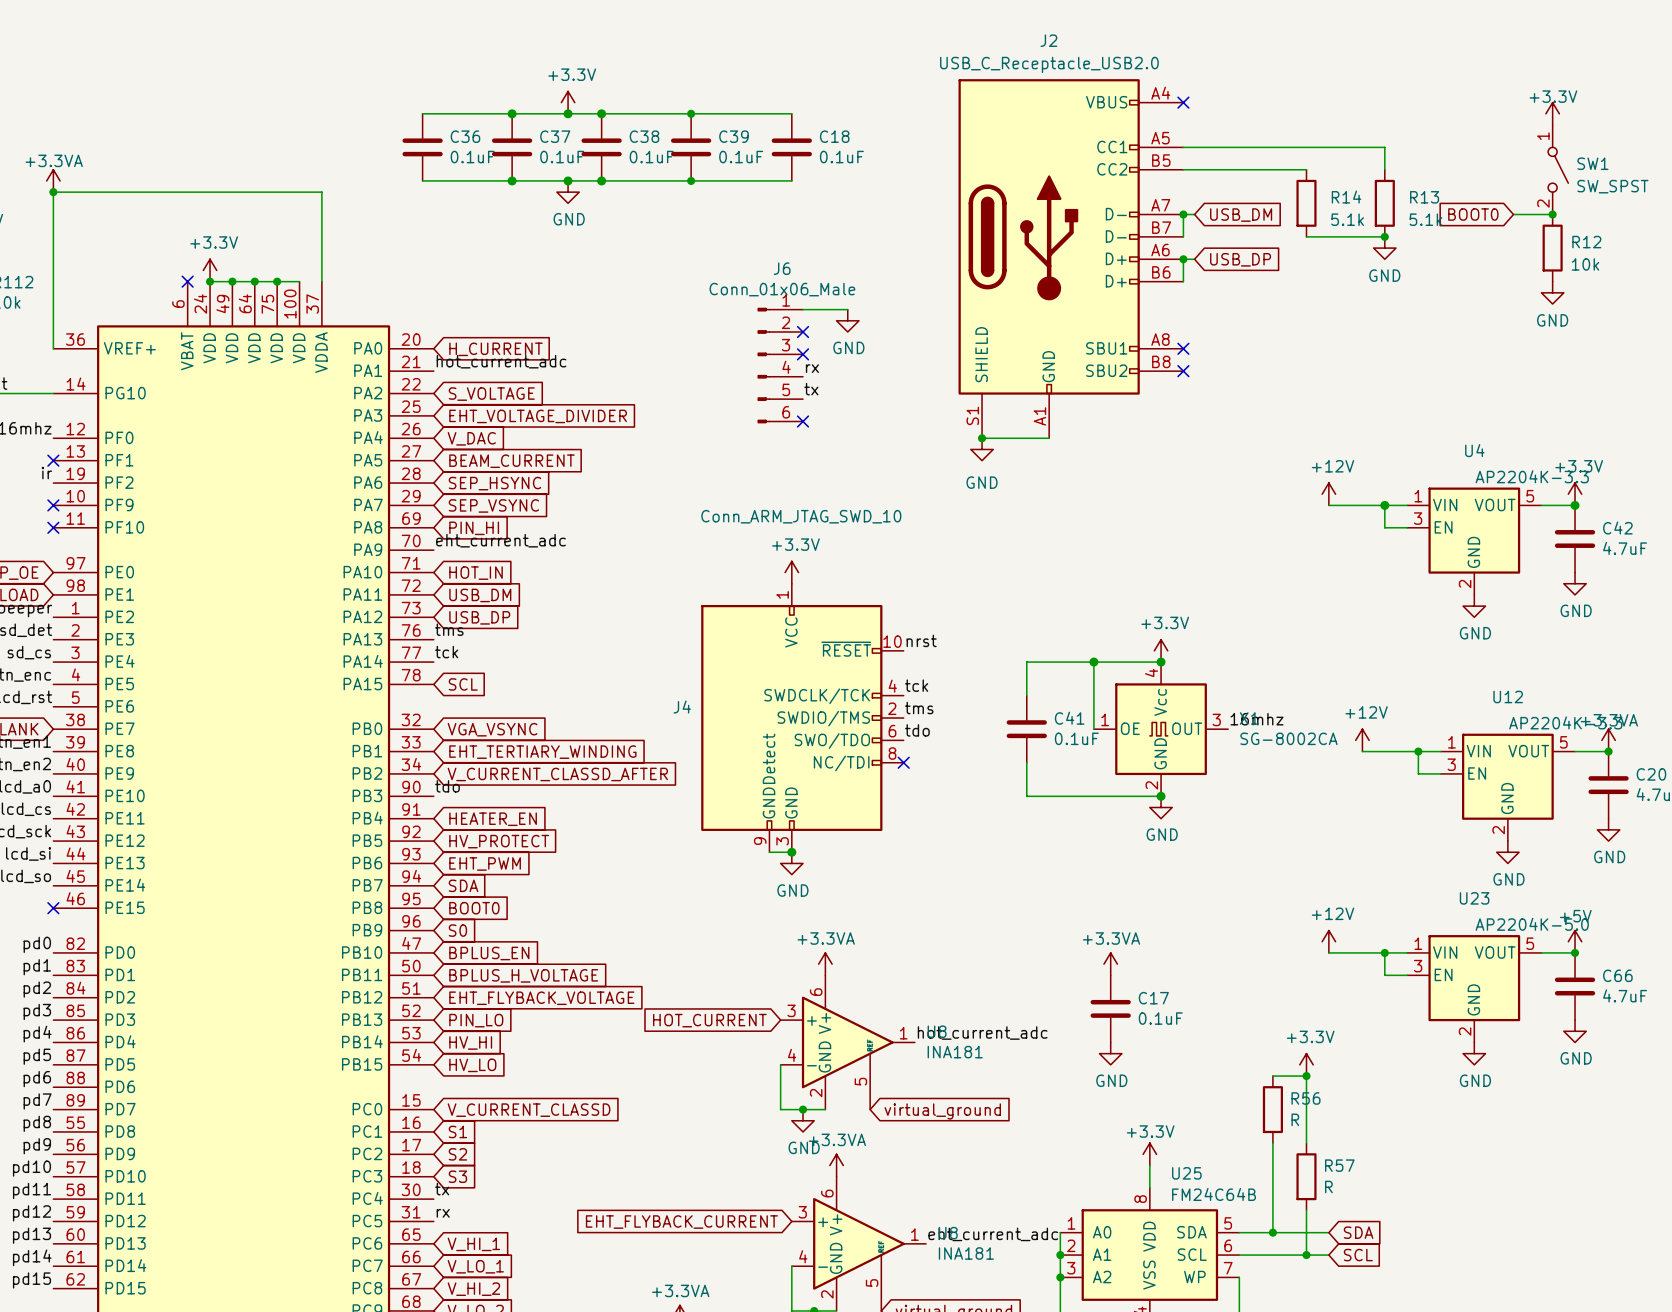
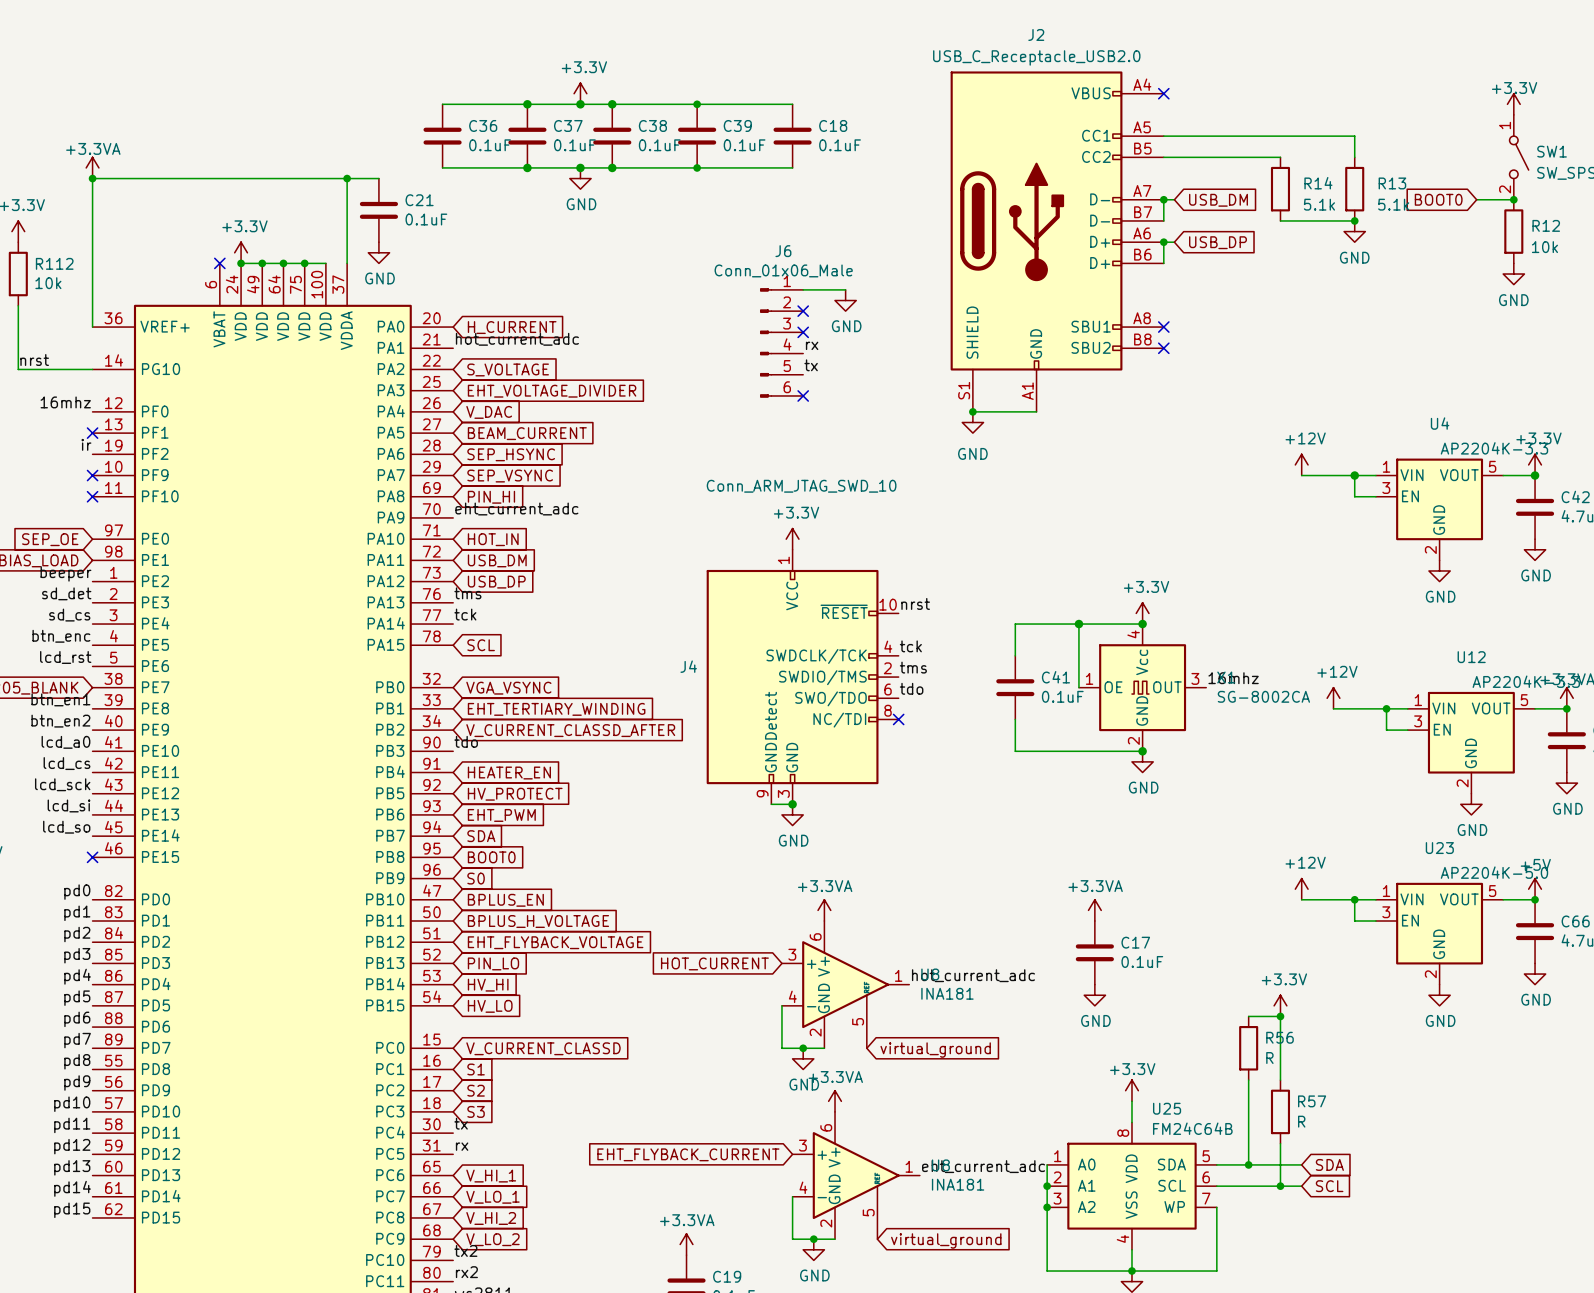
wire: none -> (347, 178) (378, 178)
junction: none -> (347, 178)
C21: none -> 0.1uF (378, 210)
power symbol: none -> GND (378, 252)

